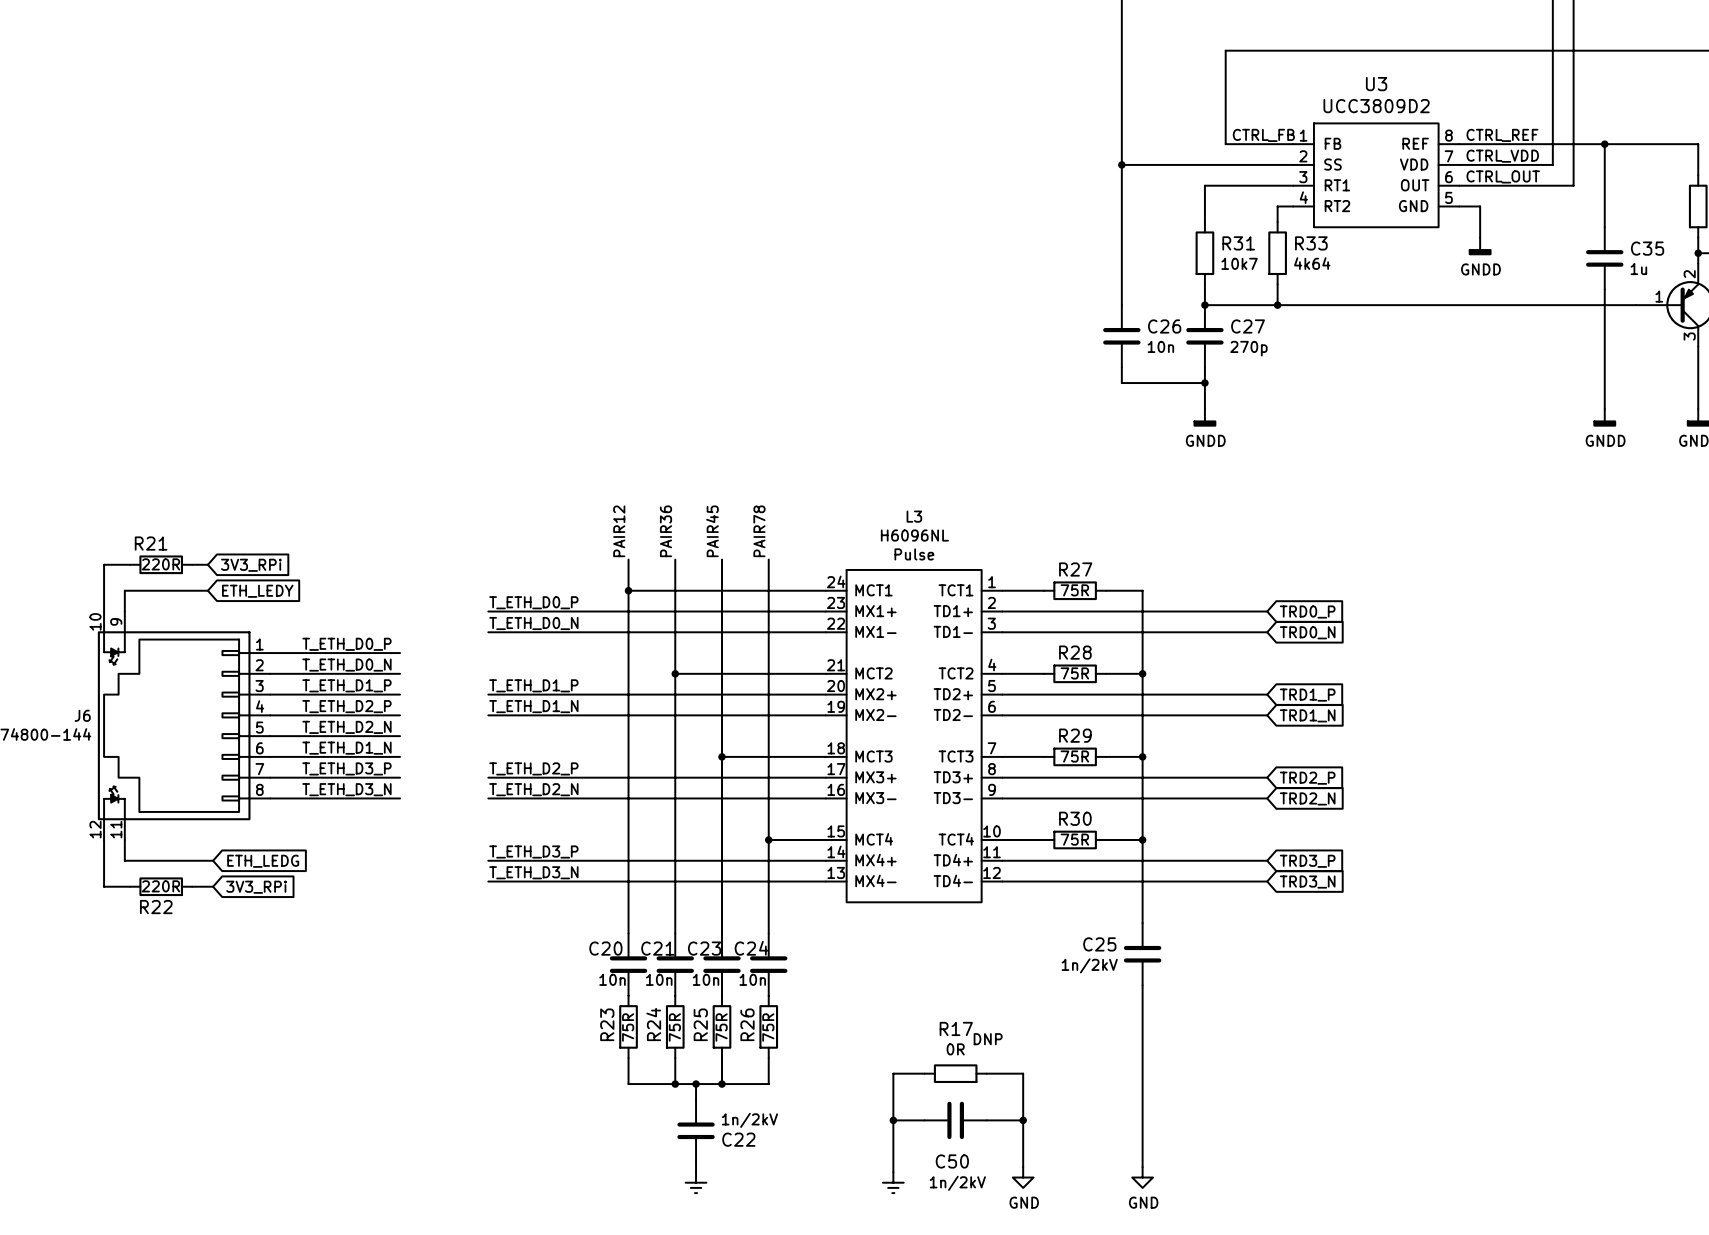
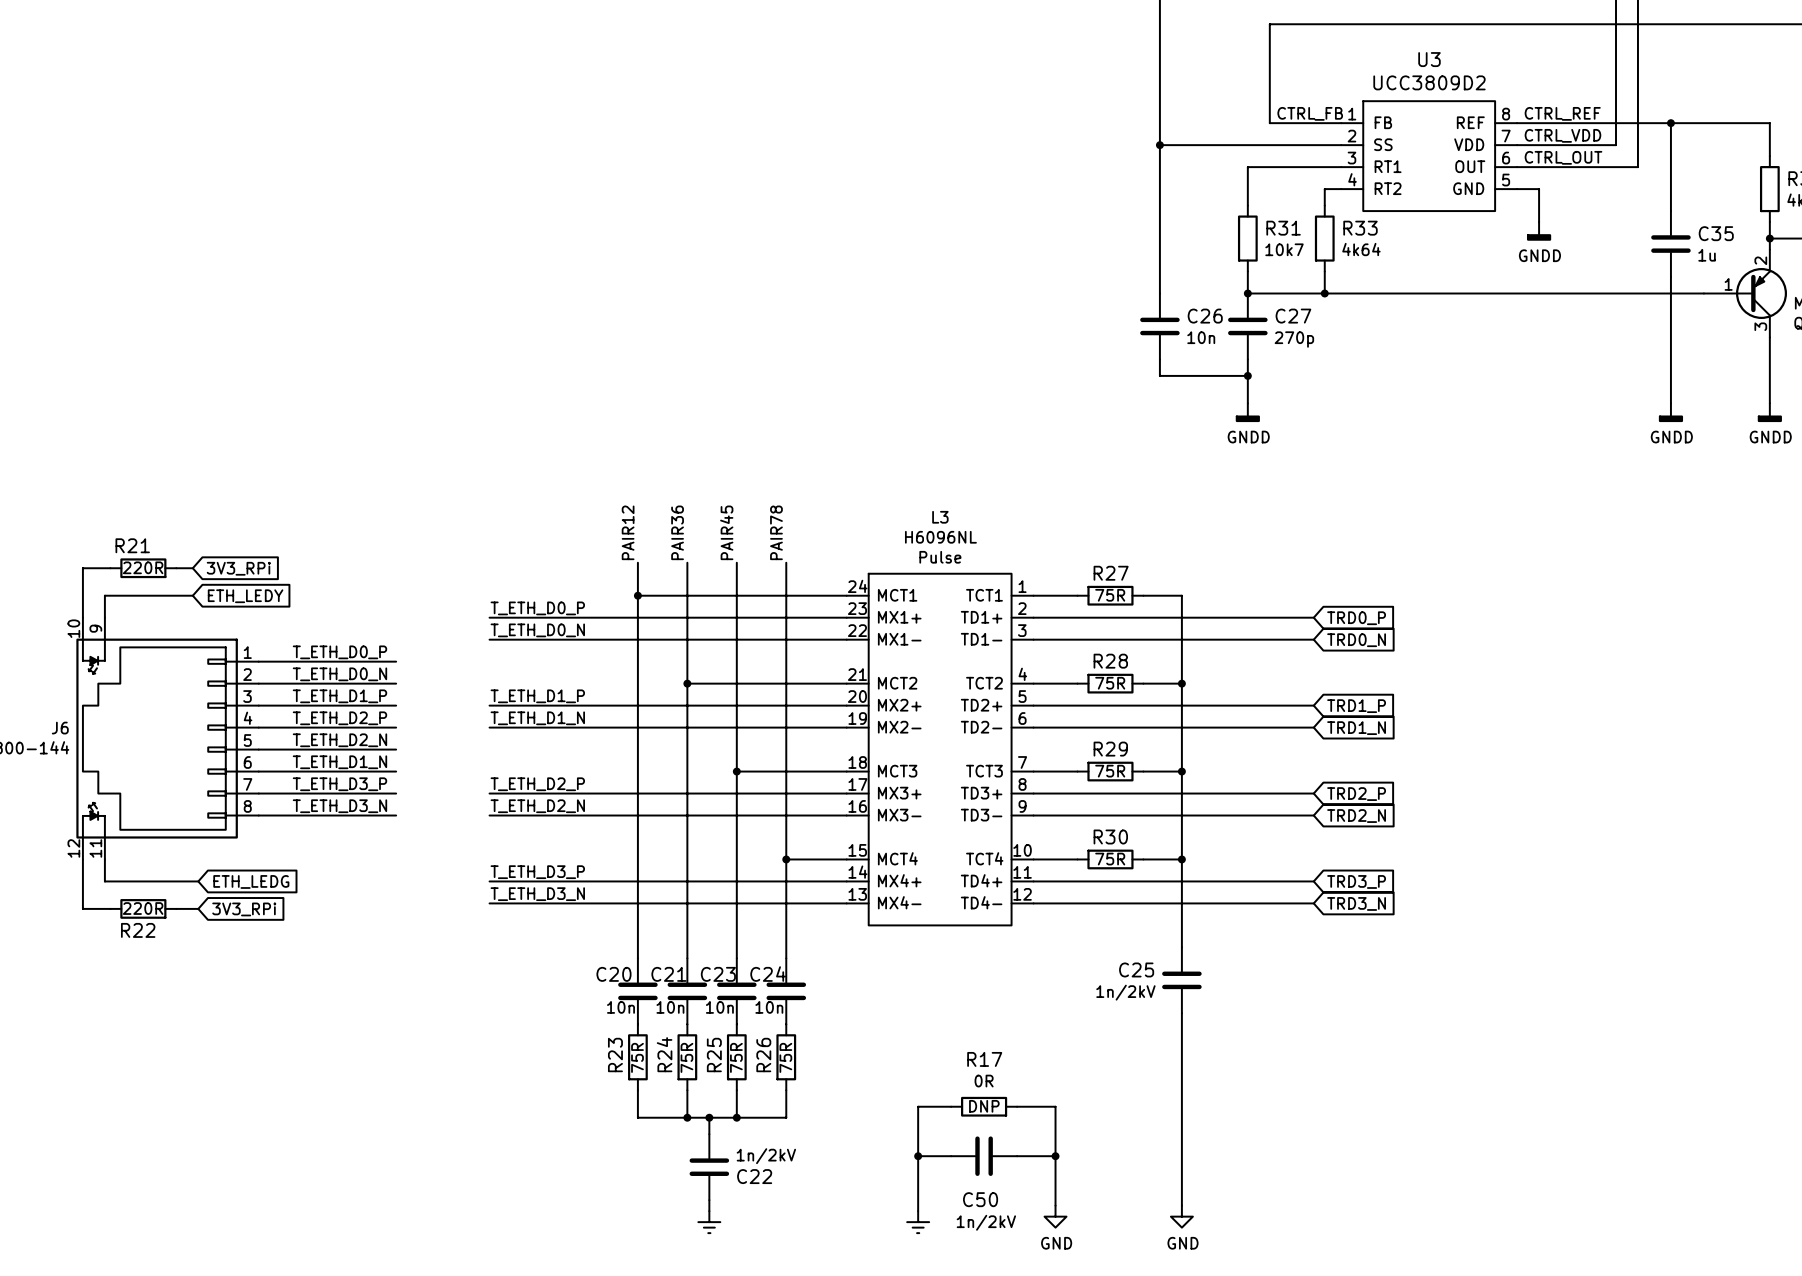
text: DNP (988, 1039) -> none
R17 text: none -> DNP (984, 1106)

